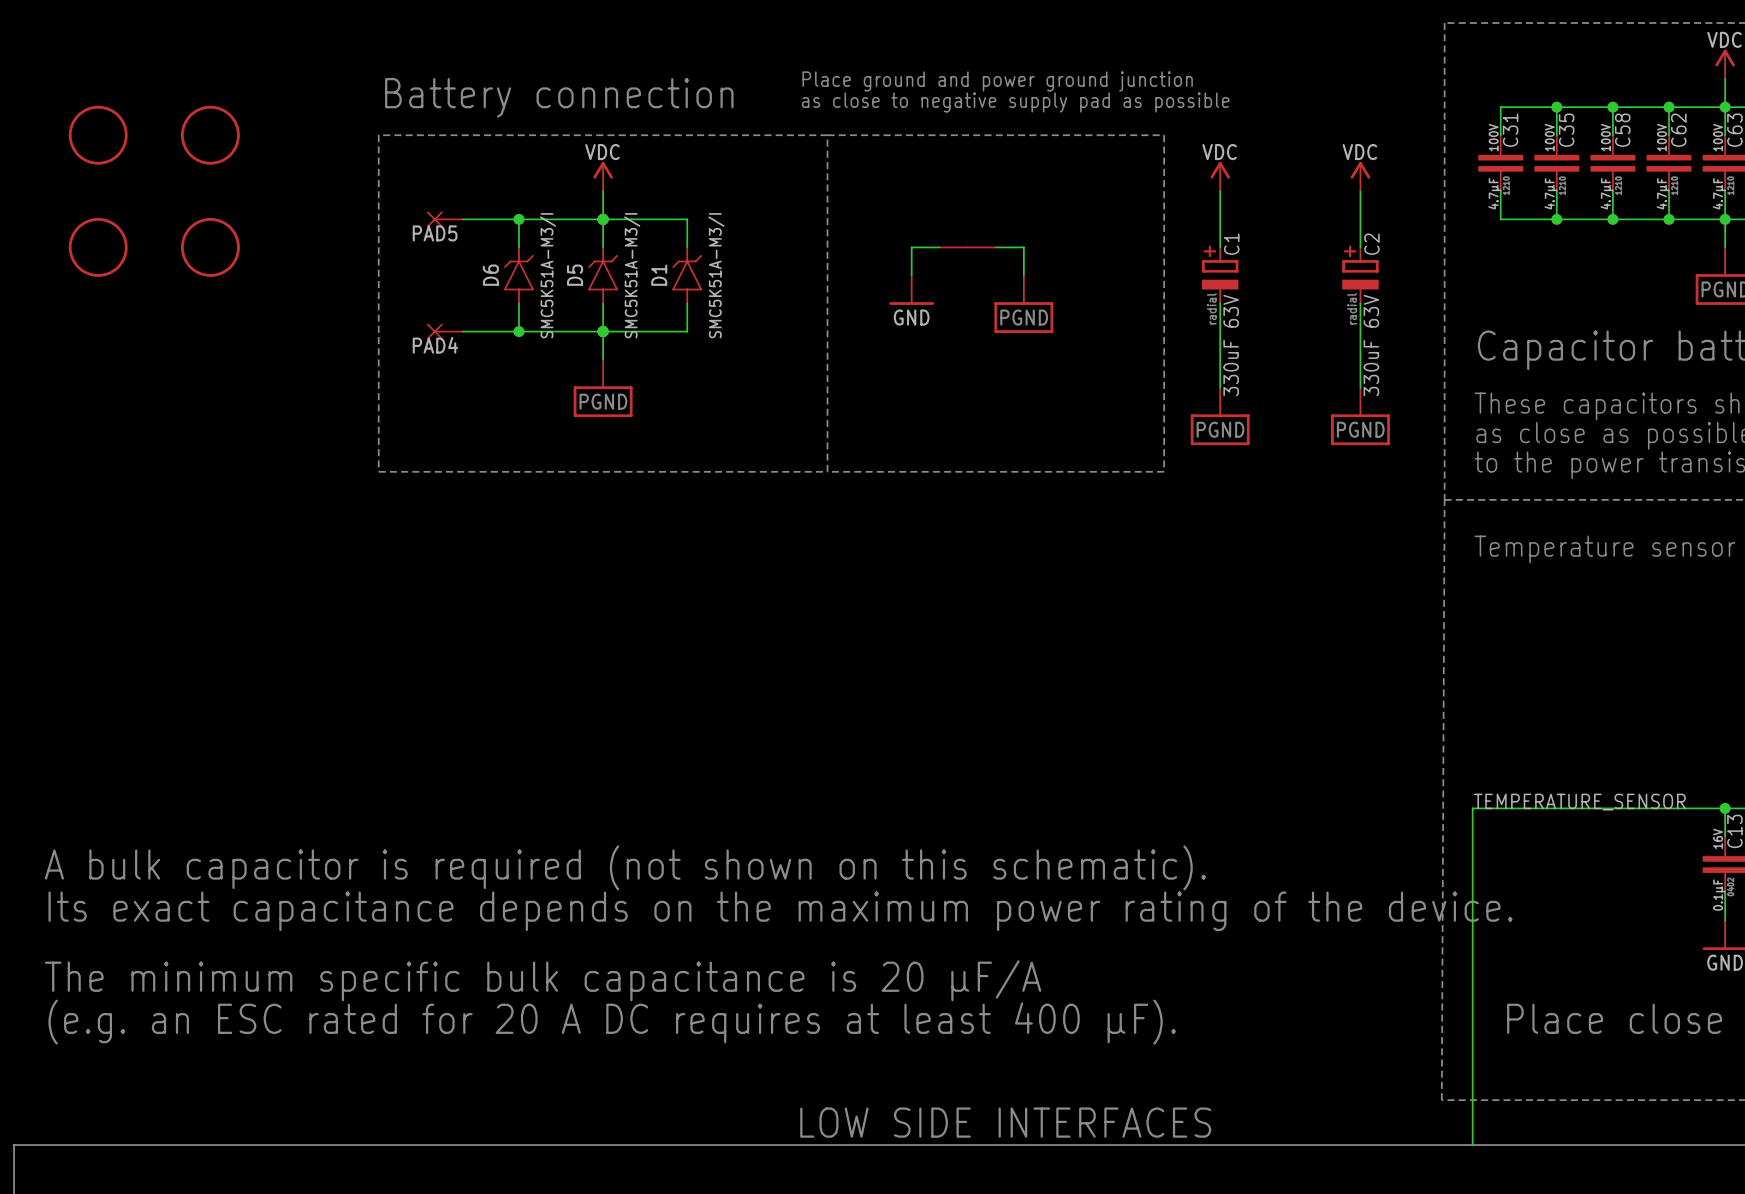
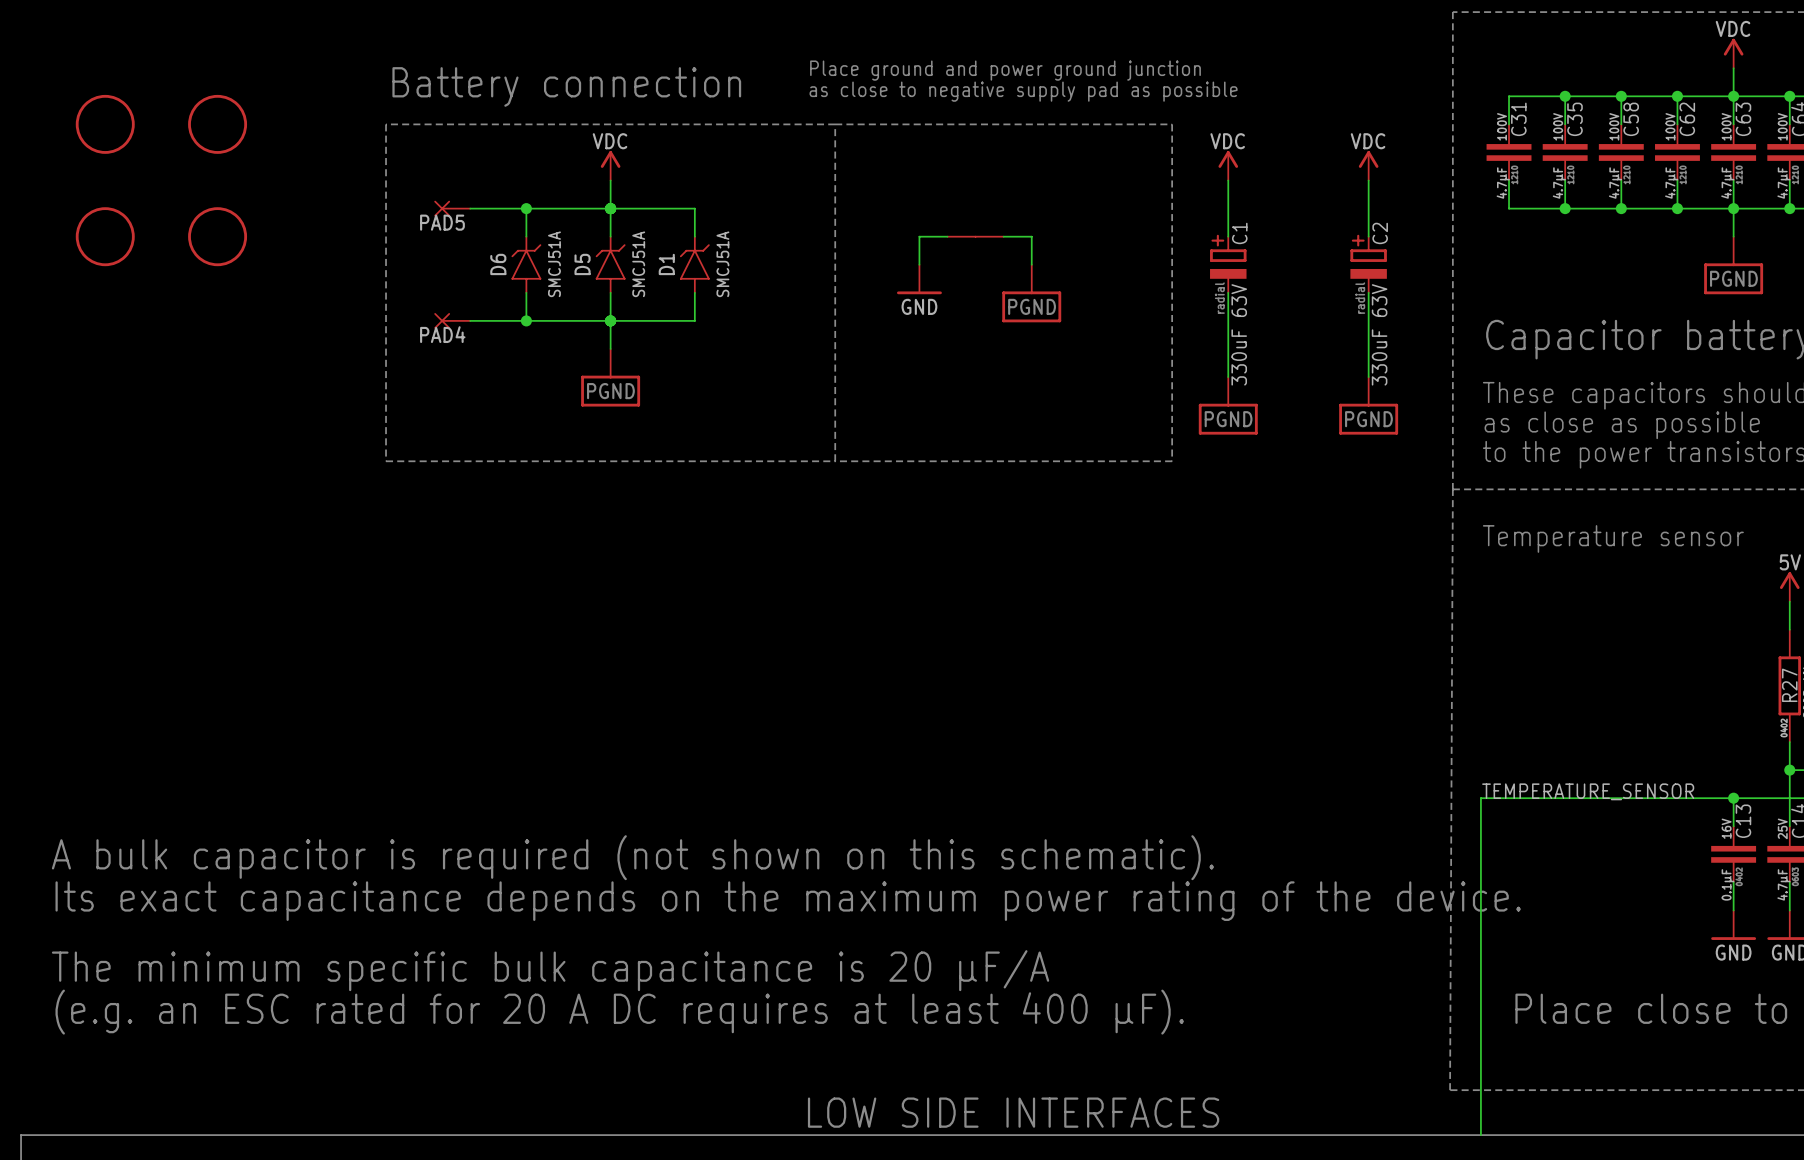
D6 text: SMC5K51A-M3/I (548, 275) -> SMCJ51A (554, 264)
D5 text: SMC5K51A-M3/I (632, 275) -> SMCJ51A (638, 264)
D1 text: SMC5K51A-M3/I (716, 275) -> SMCJ51A (722, 264)

